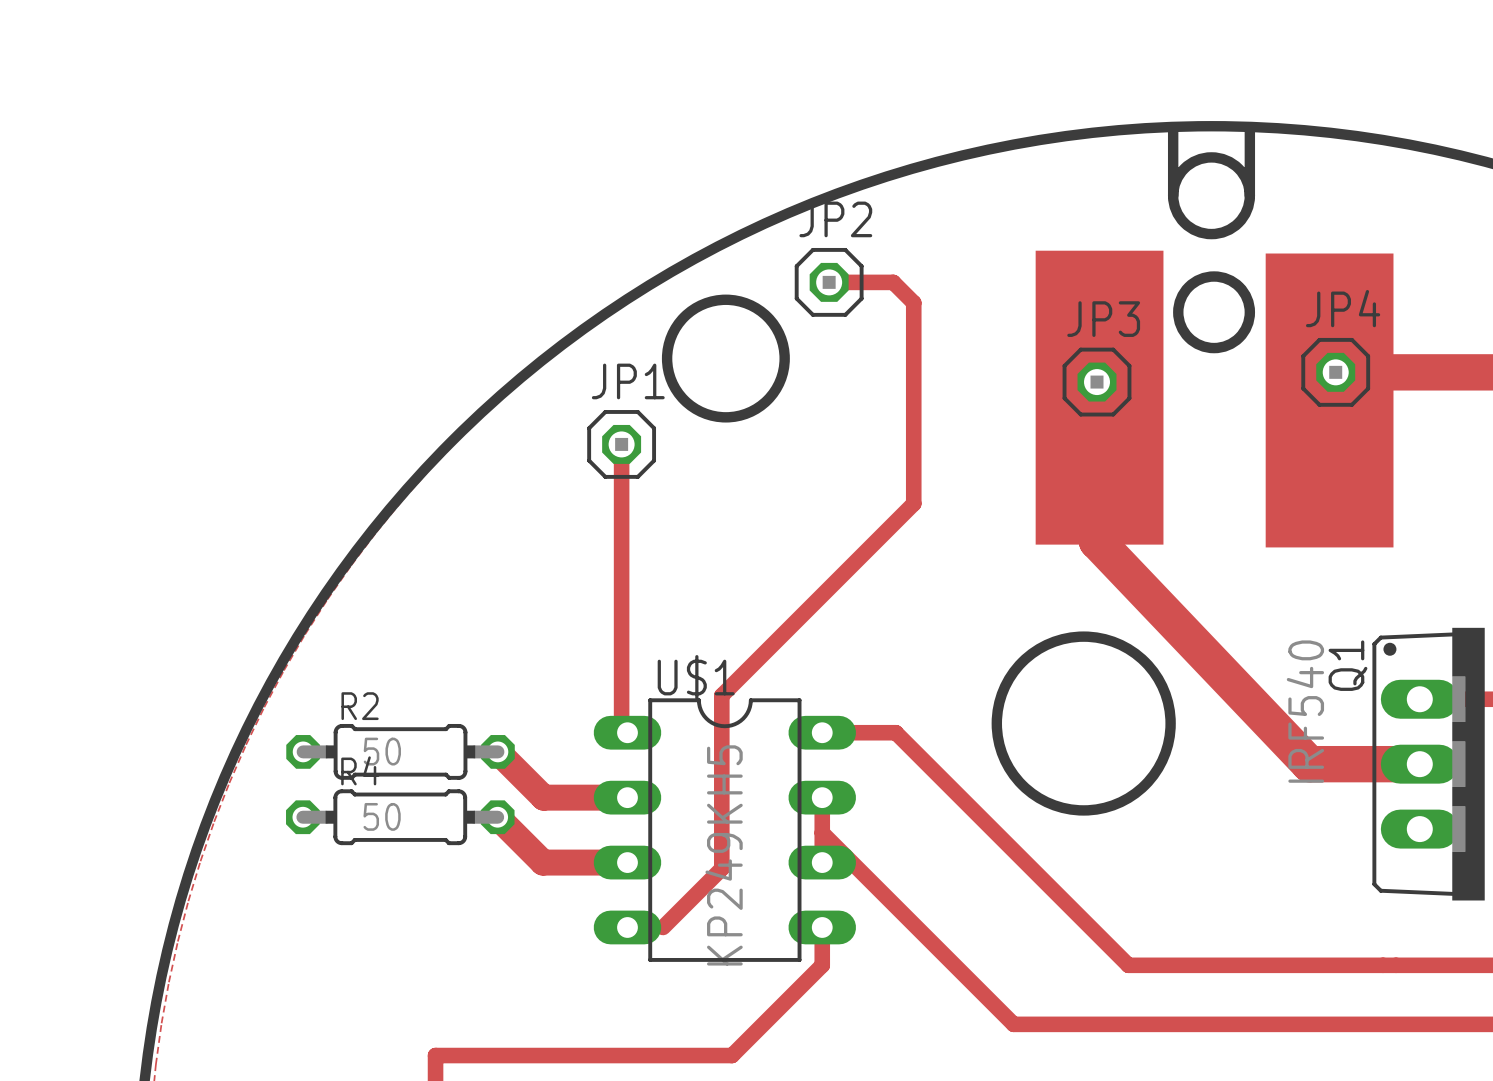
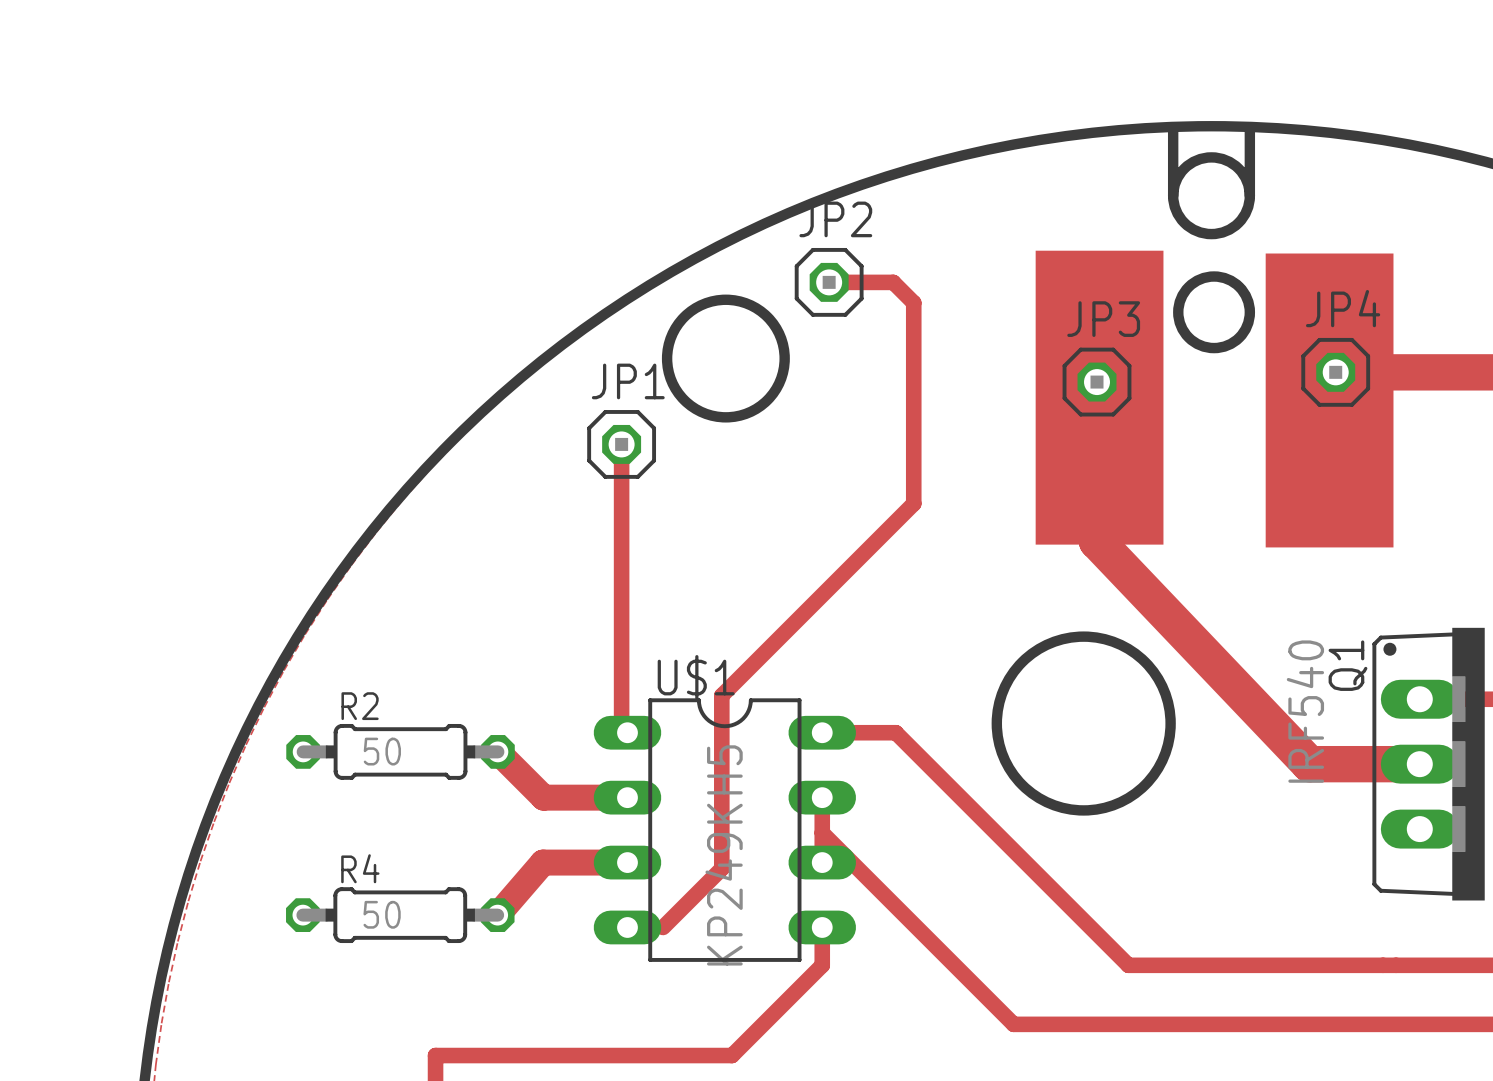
R4 position: (400, 817) -> (400, 915)
track: (497, 817) (542, 862) -> (497, 915) (542, 862)

